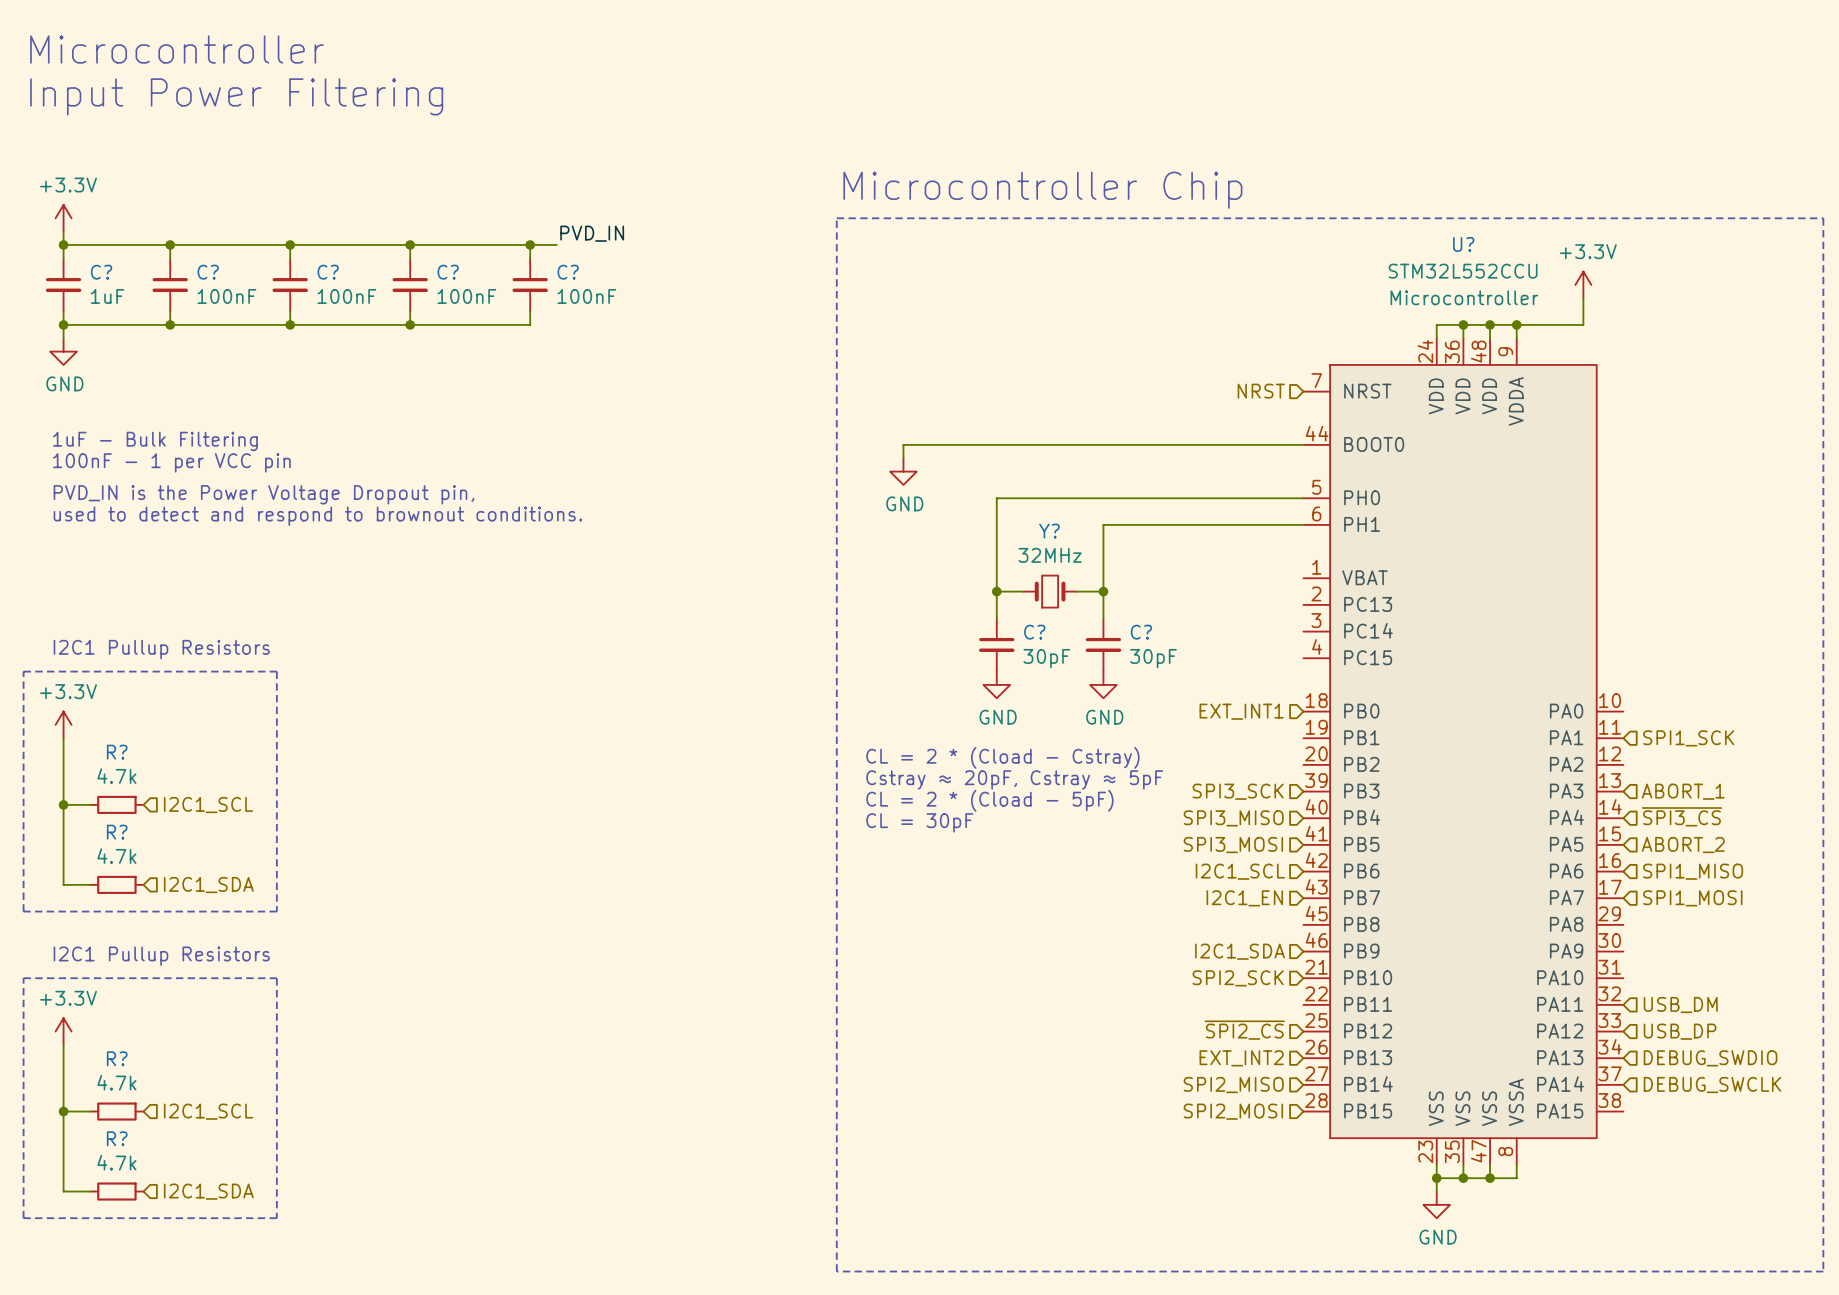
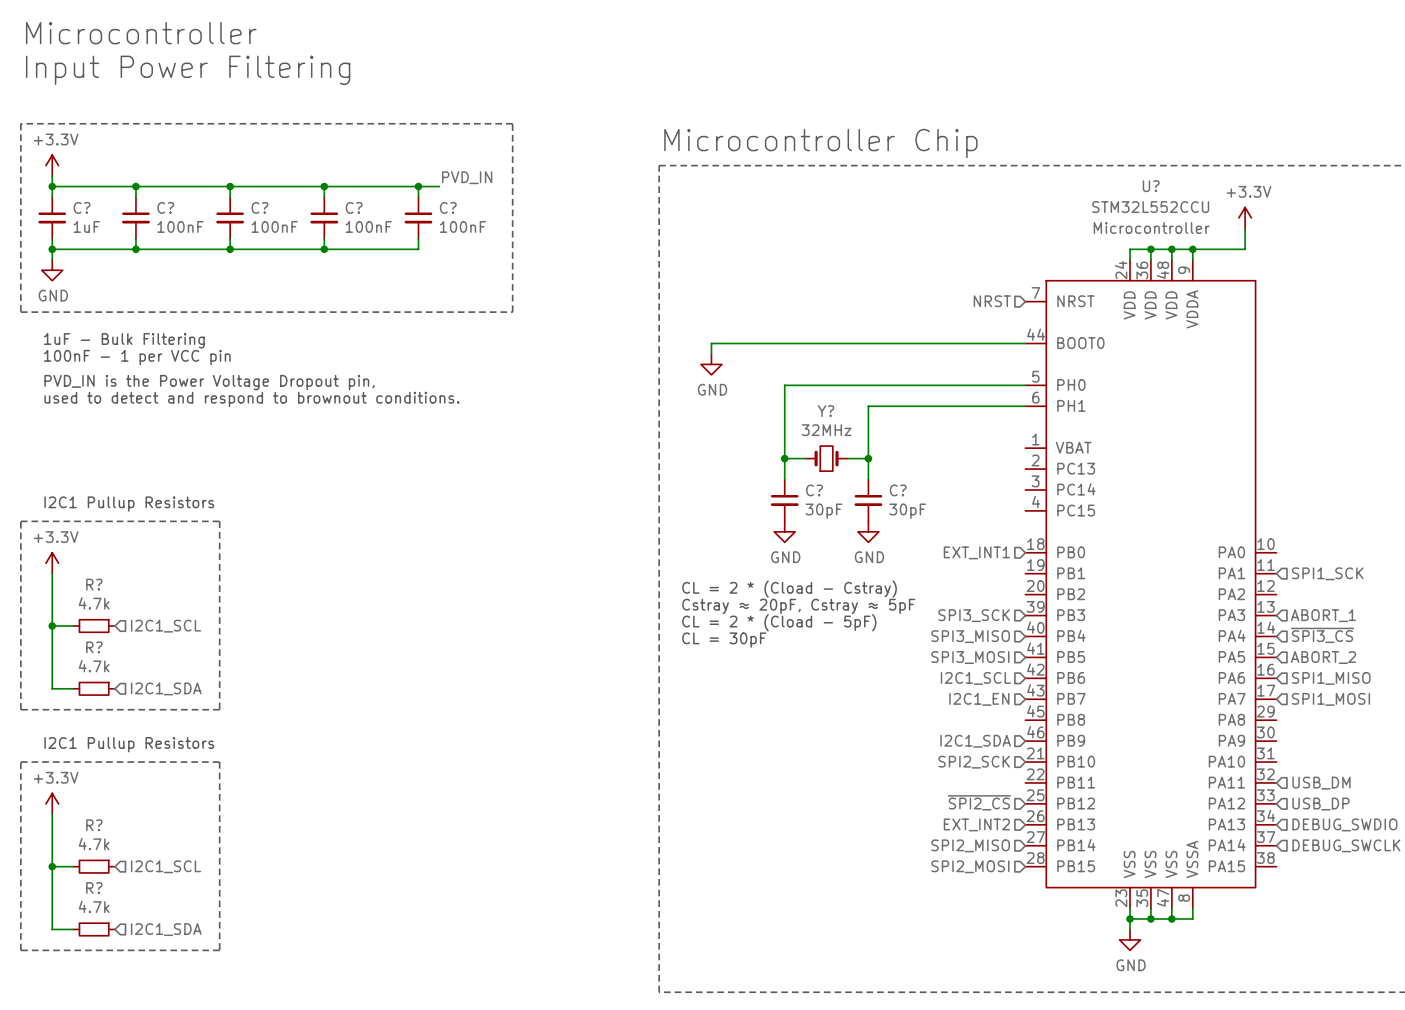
line: none -> (20, 123) (512, 123) (512, 312) (20, 312) (20, 123)

